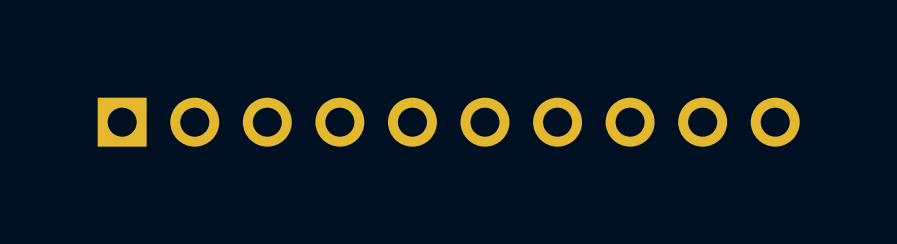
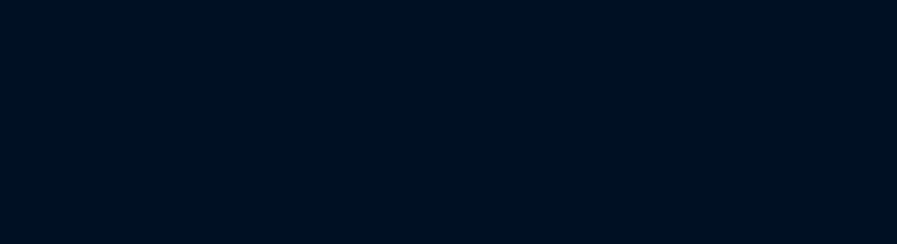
part: (448, 122) -> none

